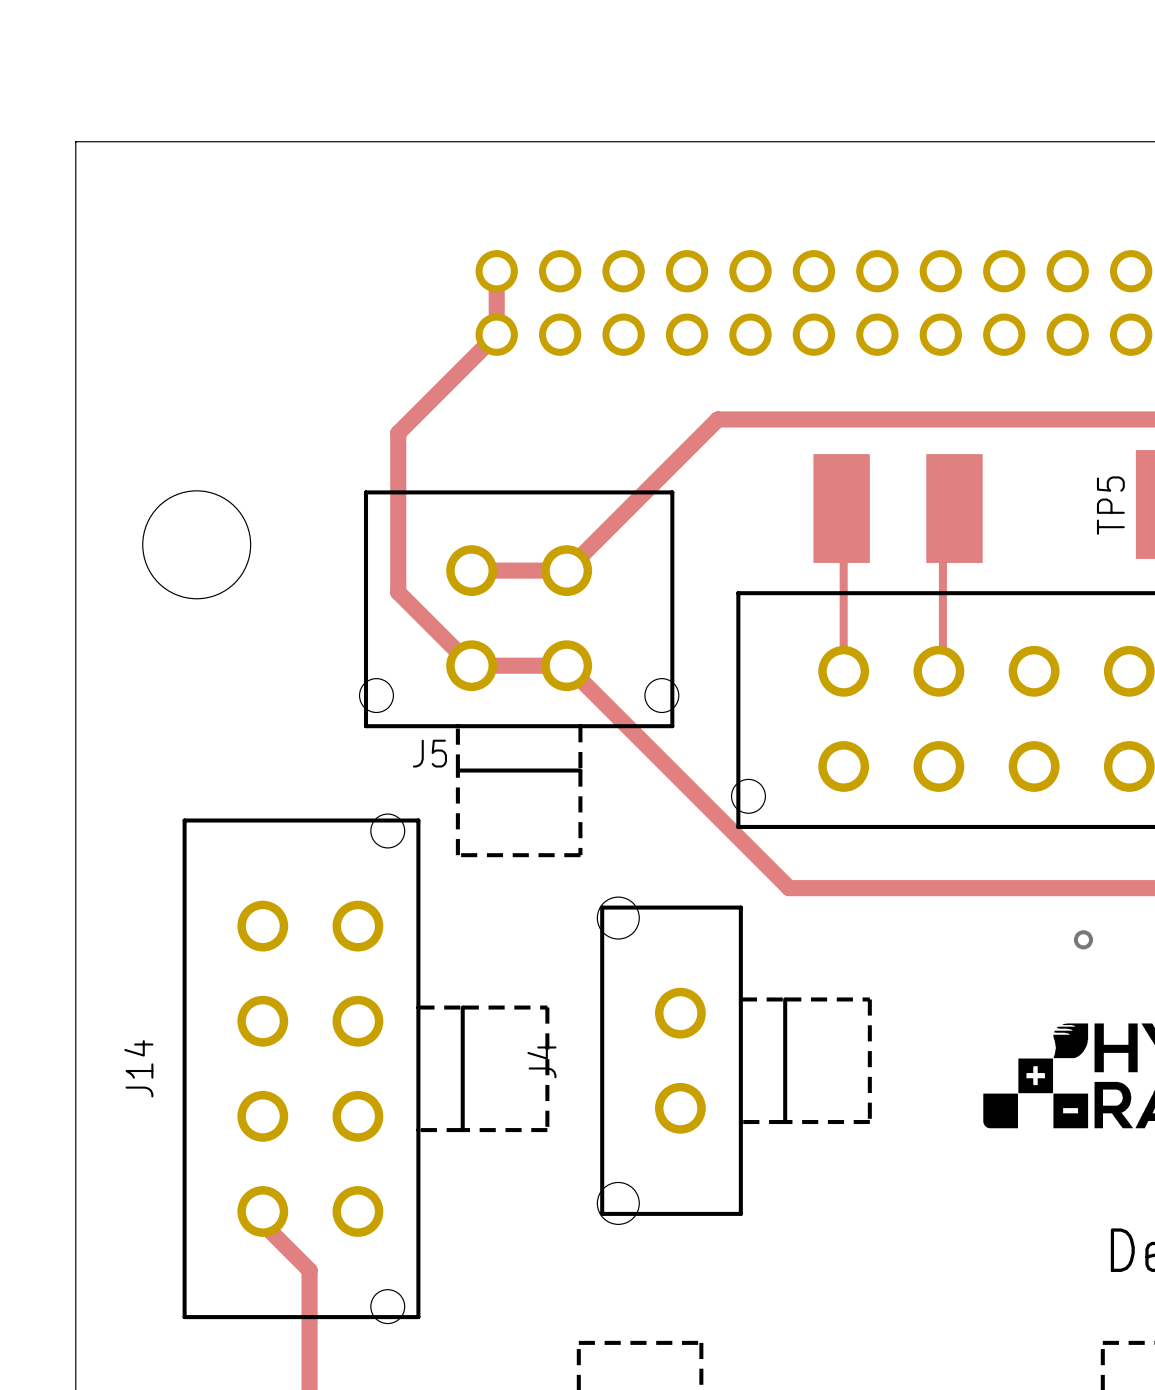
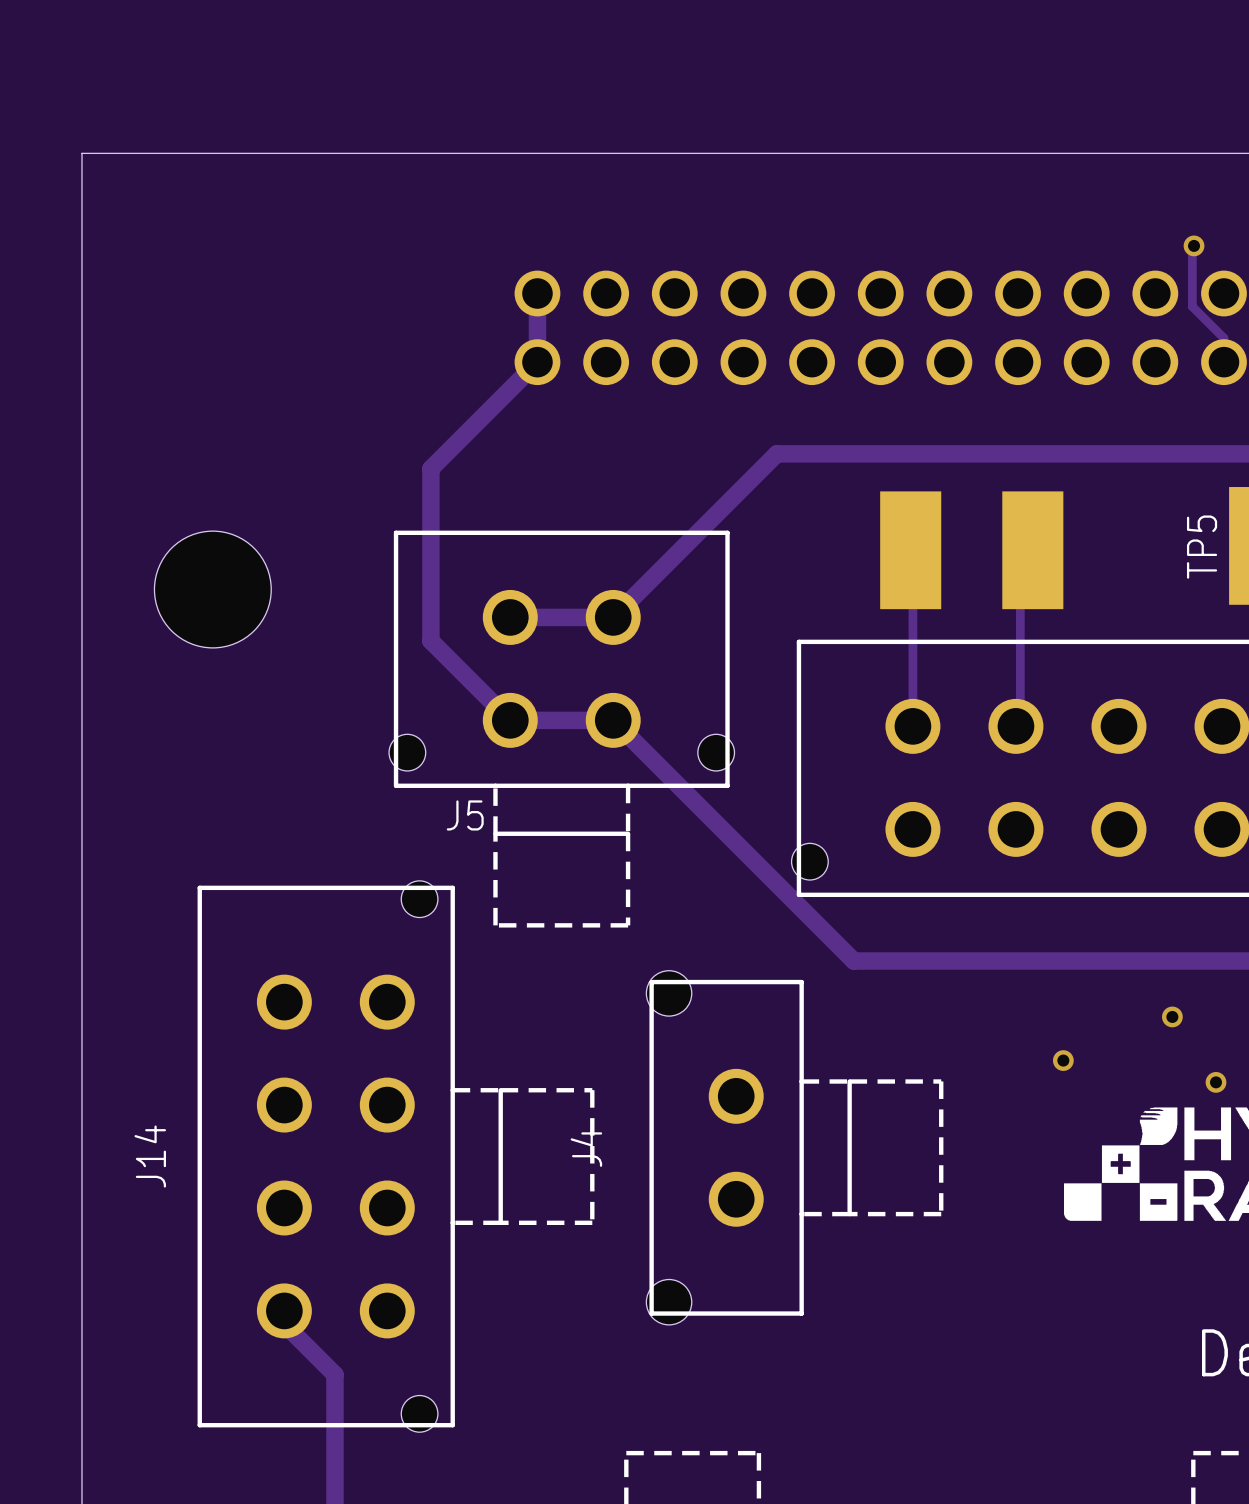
track: none -> (1194, 245) (1192, 247) (1192, 306) (1223, 338) (1223, 362)
via: none -> (1194, 245)
via: none -> (1063, 1060)
via: none -> (1216, 1082)

